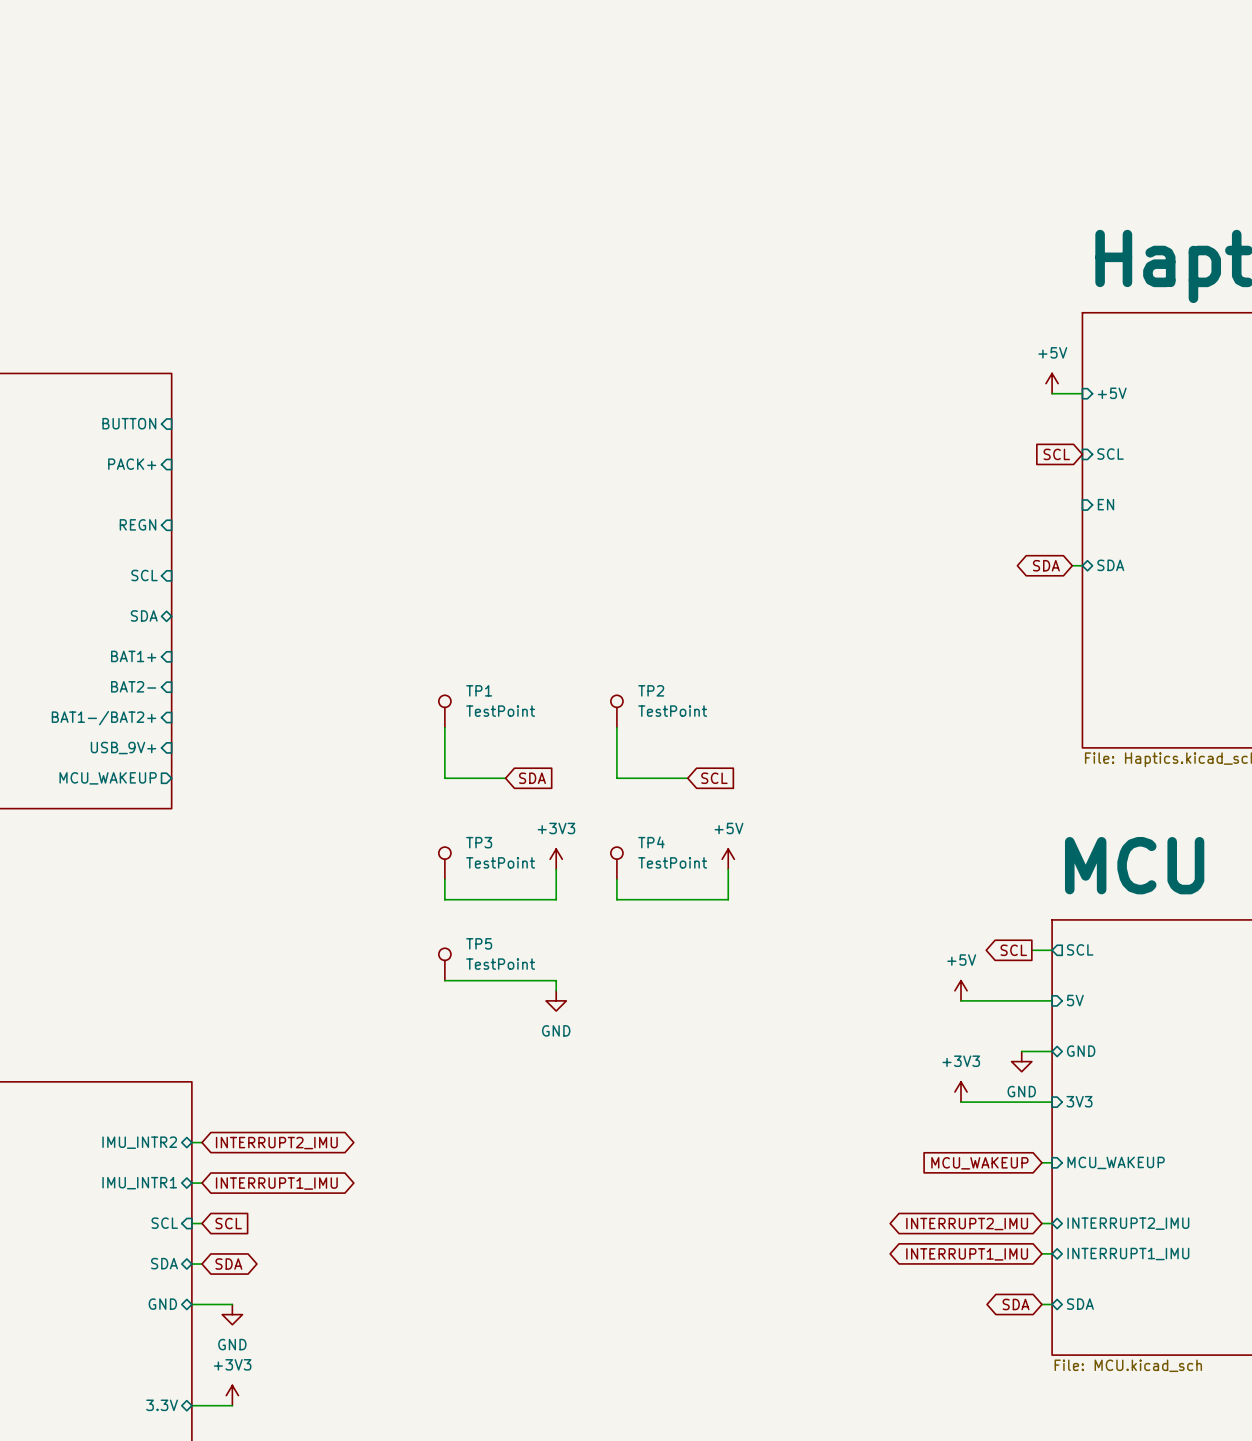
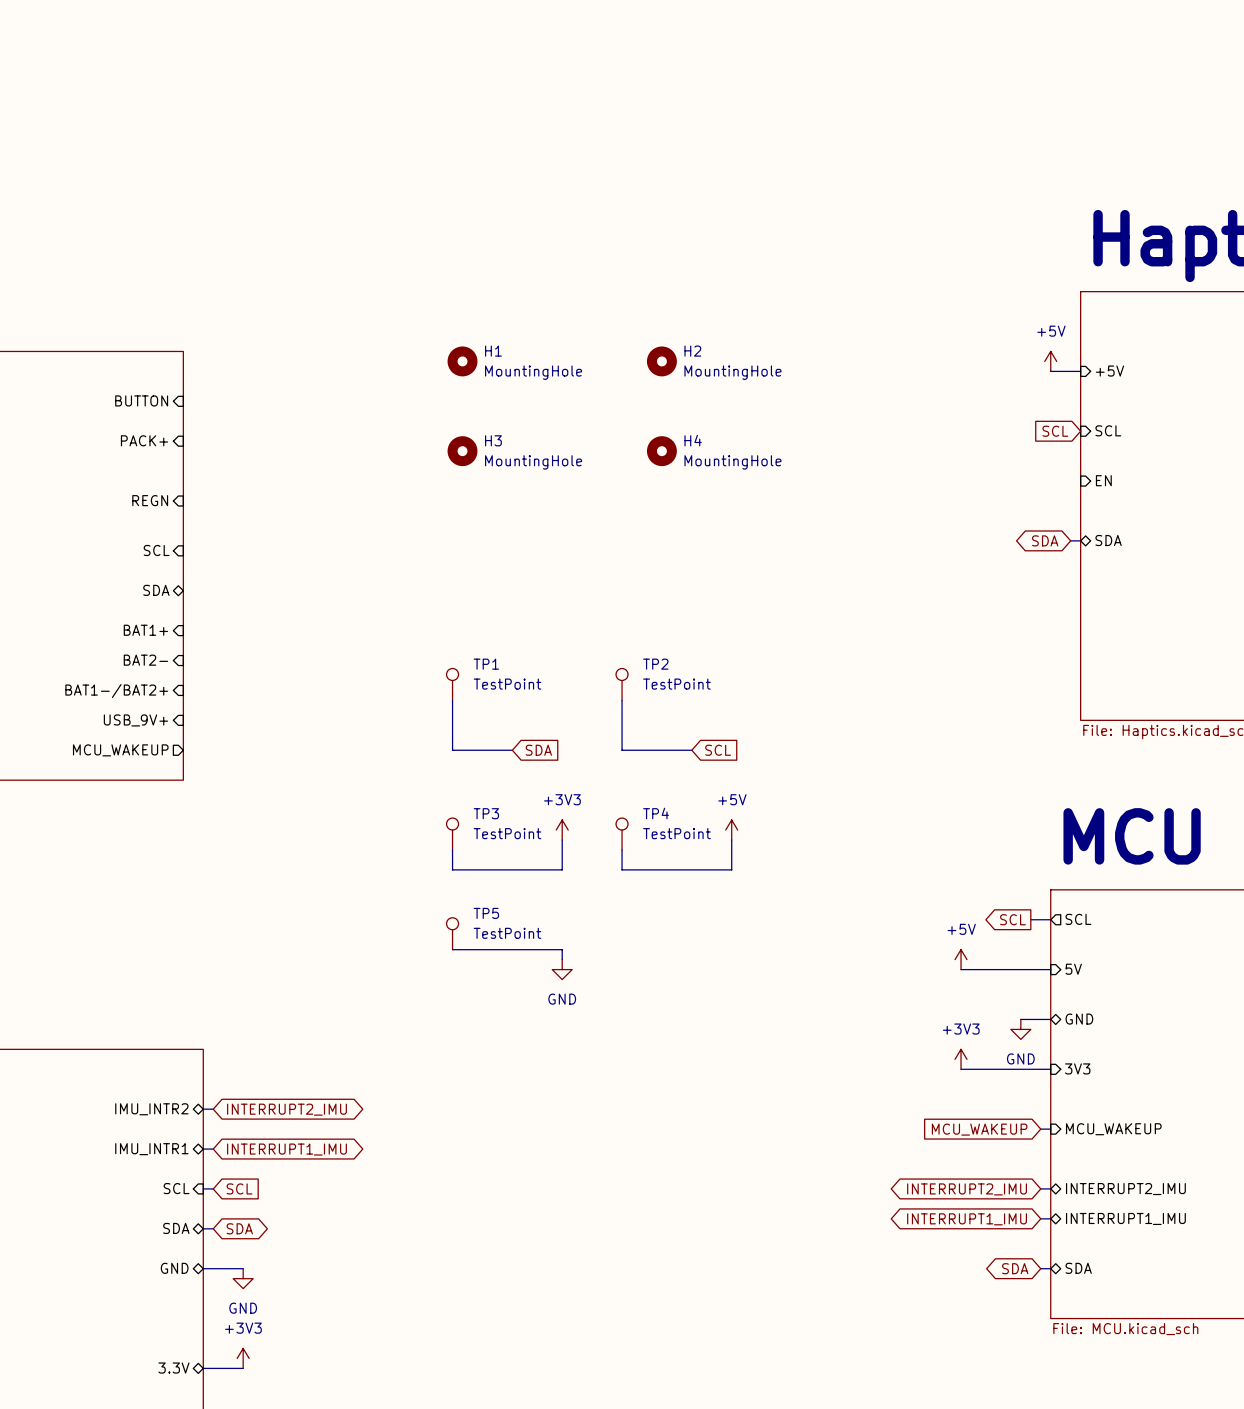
H1: none -> MountingHole (462, 361)
H2: none -> MountingHole (661, 361)
H3: none -> MountingHole (462, 451)
H4: none -> MountingHole (661, 451)

